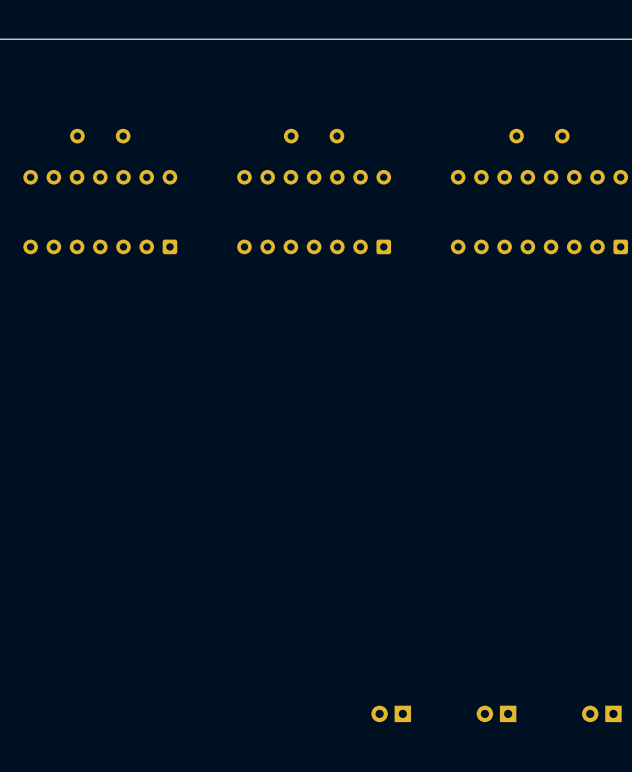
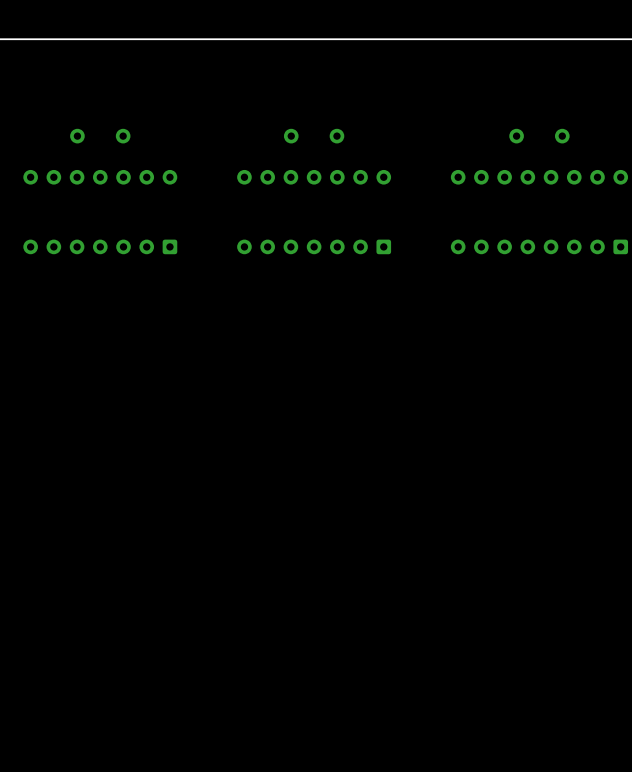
part: (391, 713) -> none
part: (496, 713) -> none
part: (601, 713) -> none

